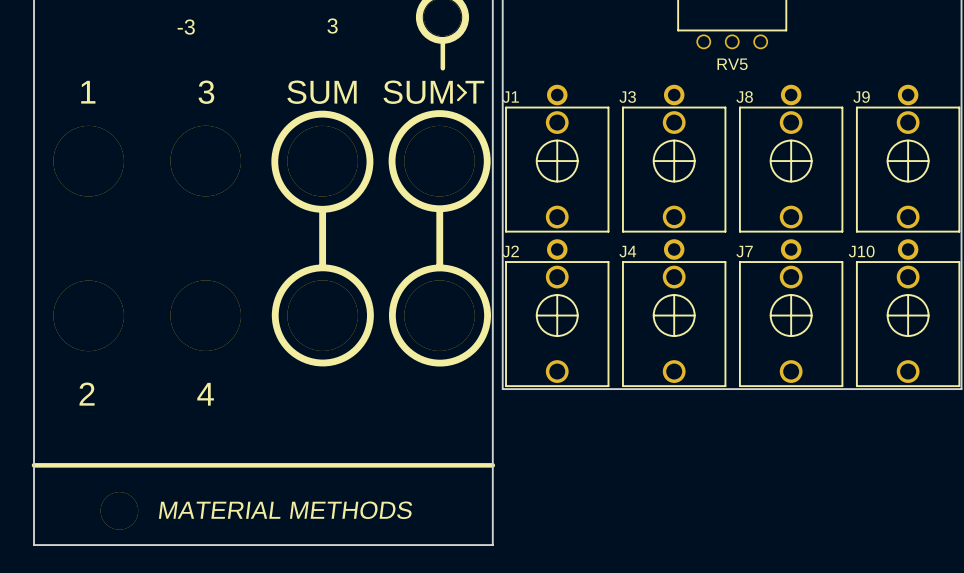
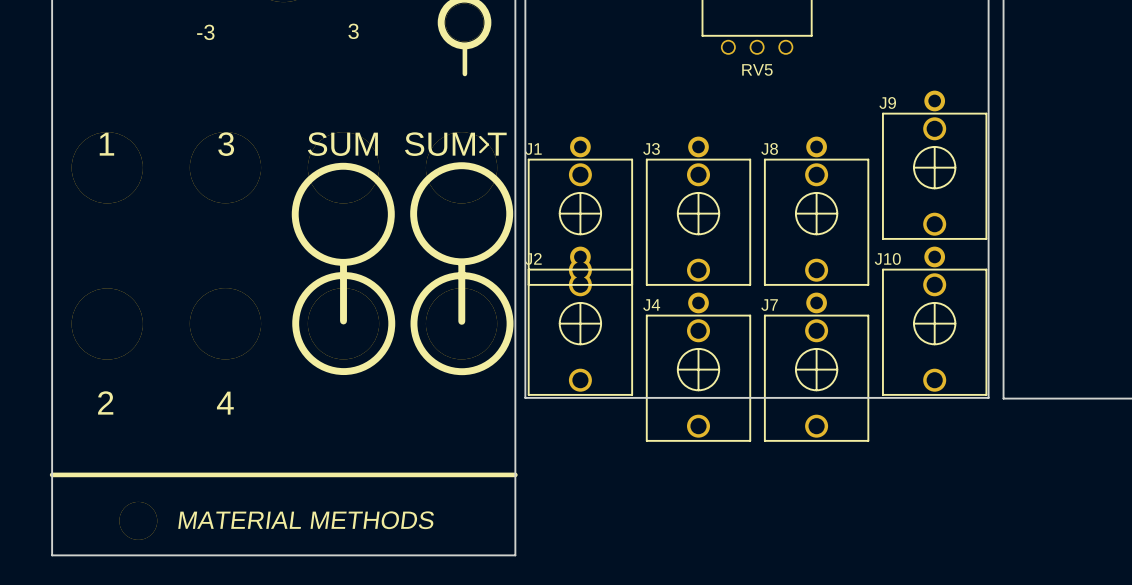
line: (458, 85) (465, 92) -> (480, 137) (487, 144)
text position: 1 (88, 92) -> 1 (106, 144)
text position: 3 (206, 92) -> 3 (226, 144)
text position: SUM (322, 92) -> SUM (342, 144)
text position: SUM T (433, 92) -> SUM T (455, 144)
line: (465, 92) (458, 100) -> (487, 144) (480, 152)
J1 position: (557, 158) -> (580, 211)
J3 position: (674, 158) -> (698, 211)
J8 position: (791, 158) -> (816, 211)
drawing position: (322, 161) -> (343, 214)
drawing position: (439, 161) -> (461, 213)
line: (322, 209) (322, 255) -> (343, 275) (343, 320)
line: (439, 210) (439, 255) -> (461, 275) (461, 321)
J4 position: (674, 313) -> (698, 367)
J7 position: (791, 313) -> (816, 367)

